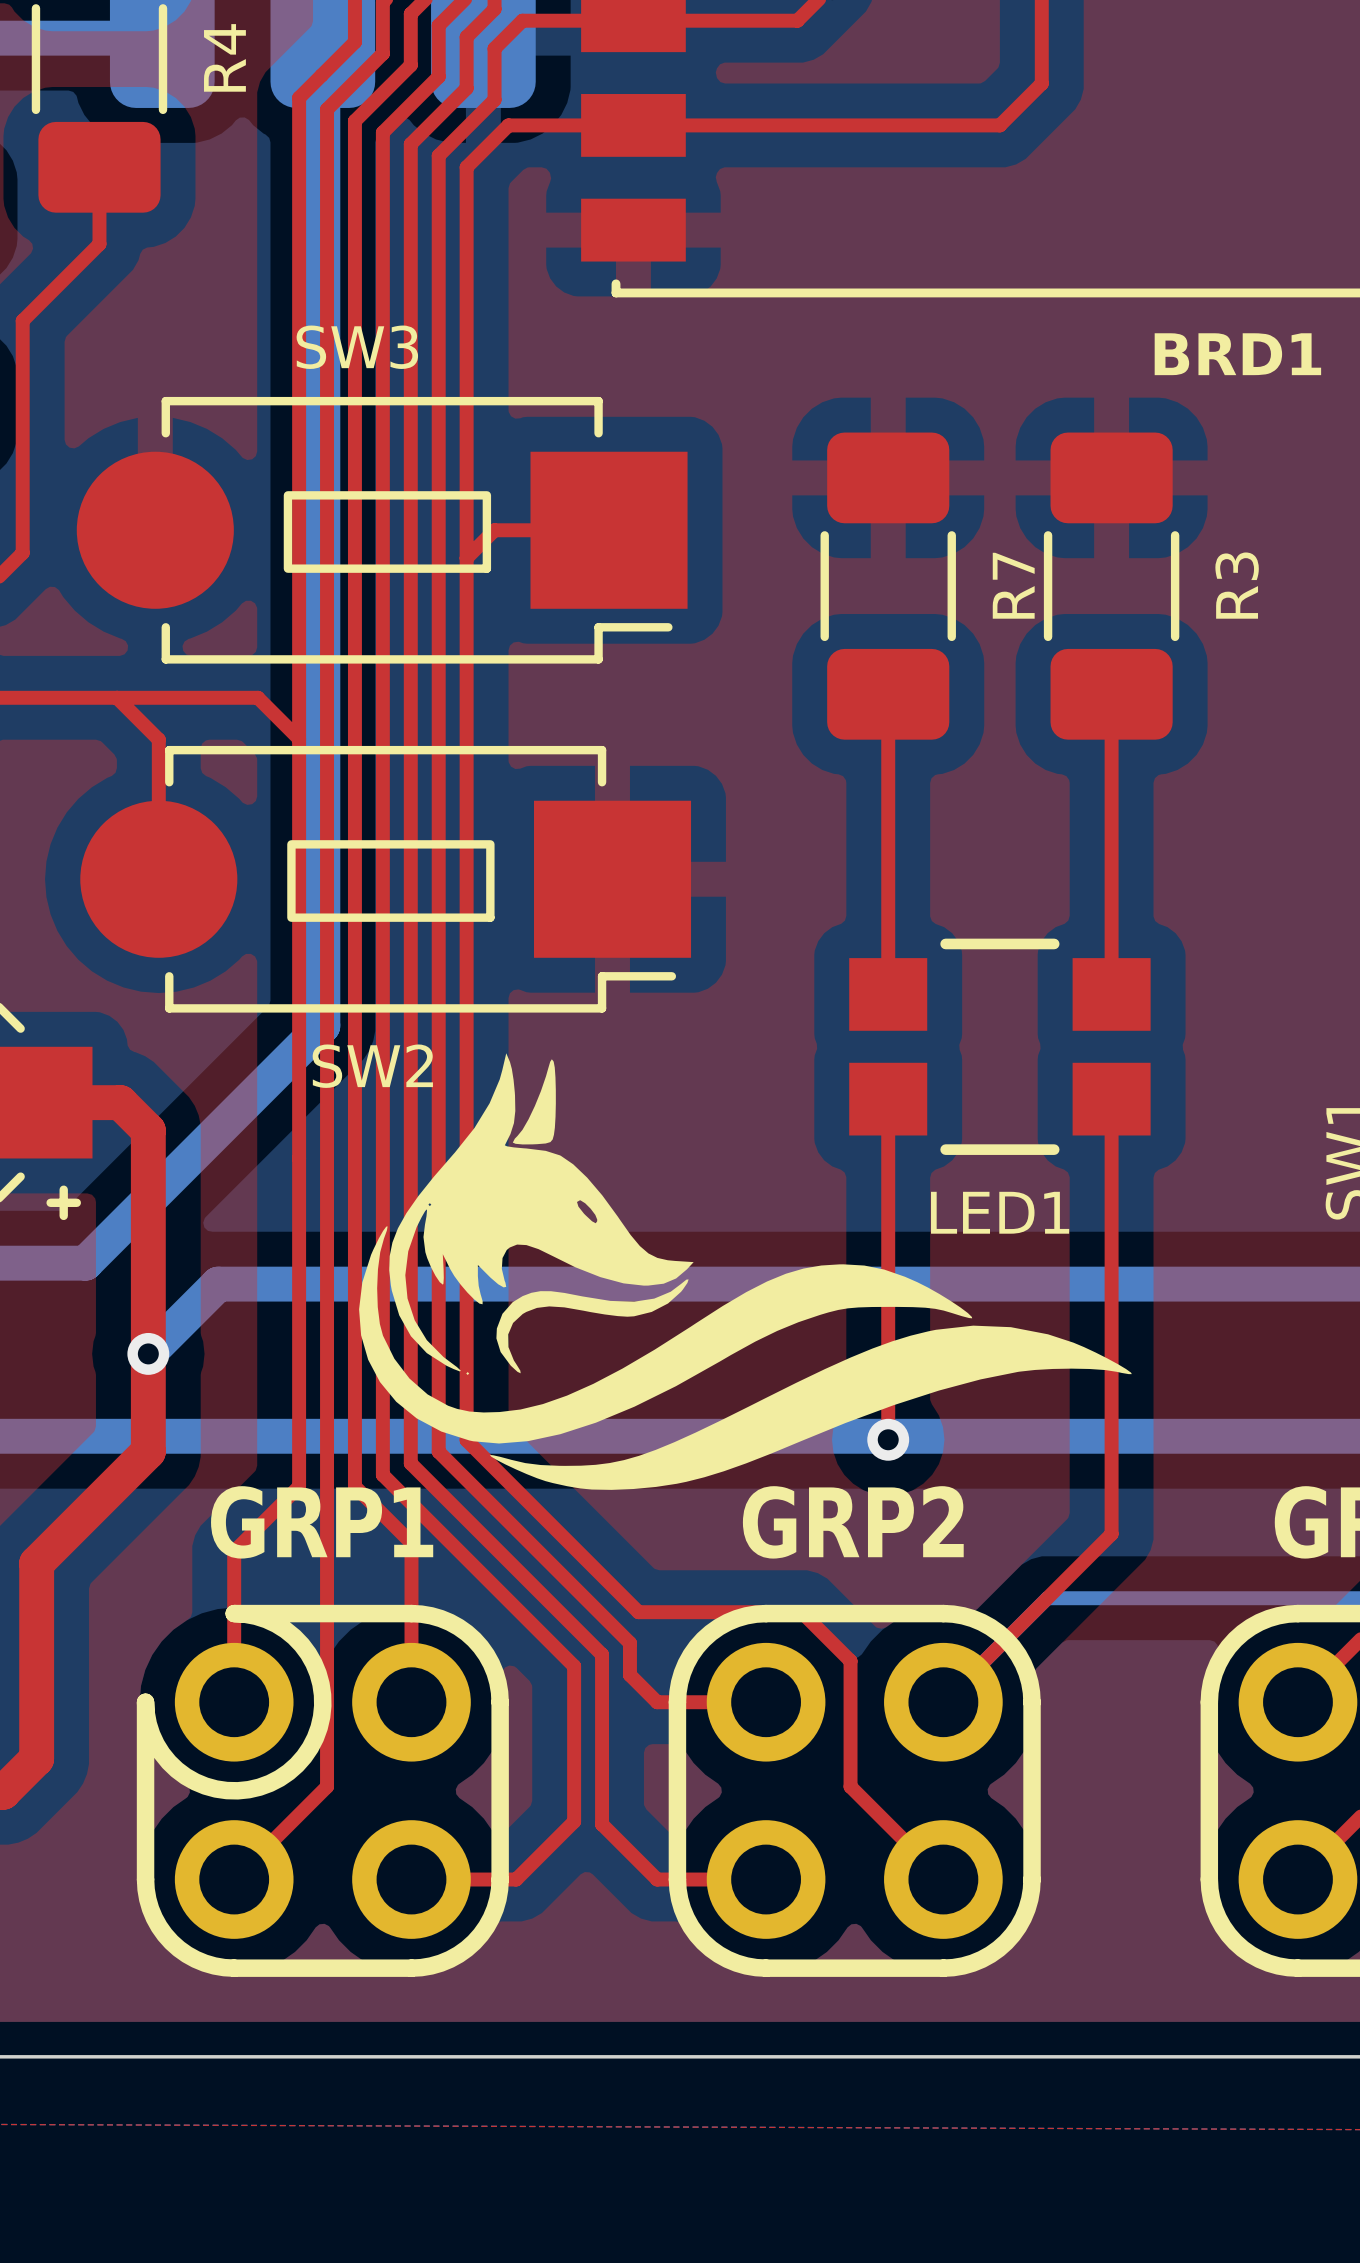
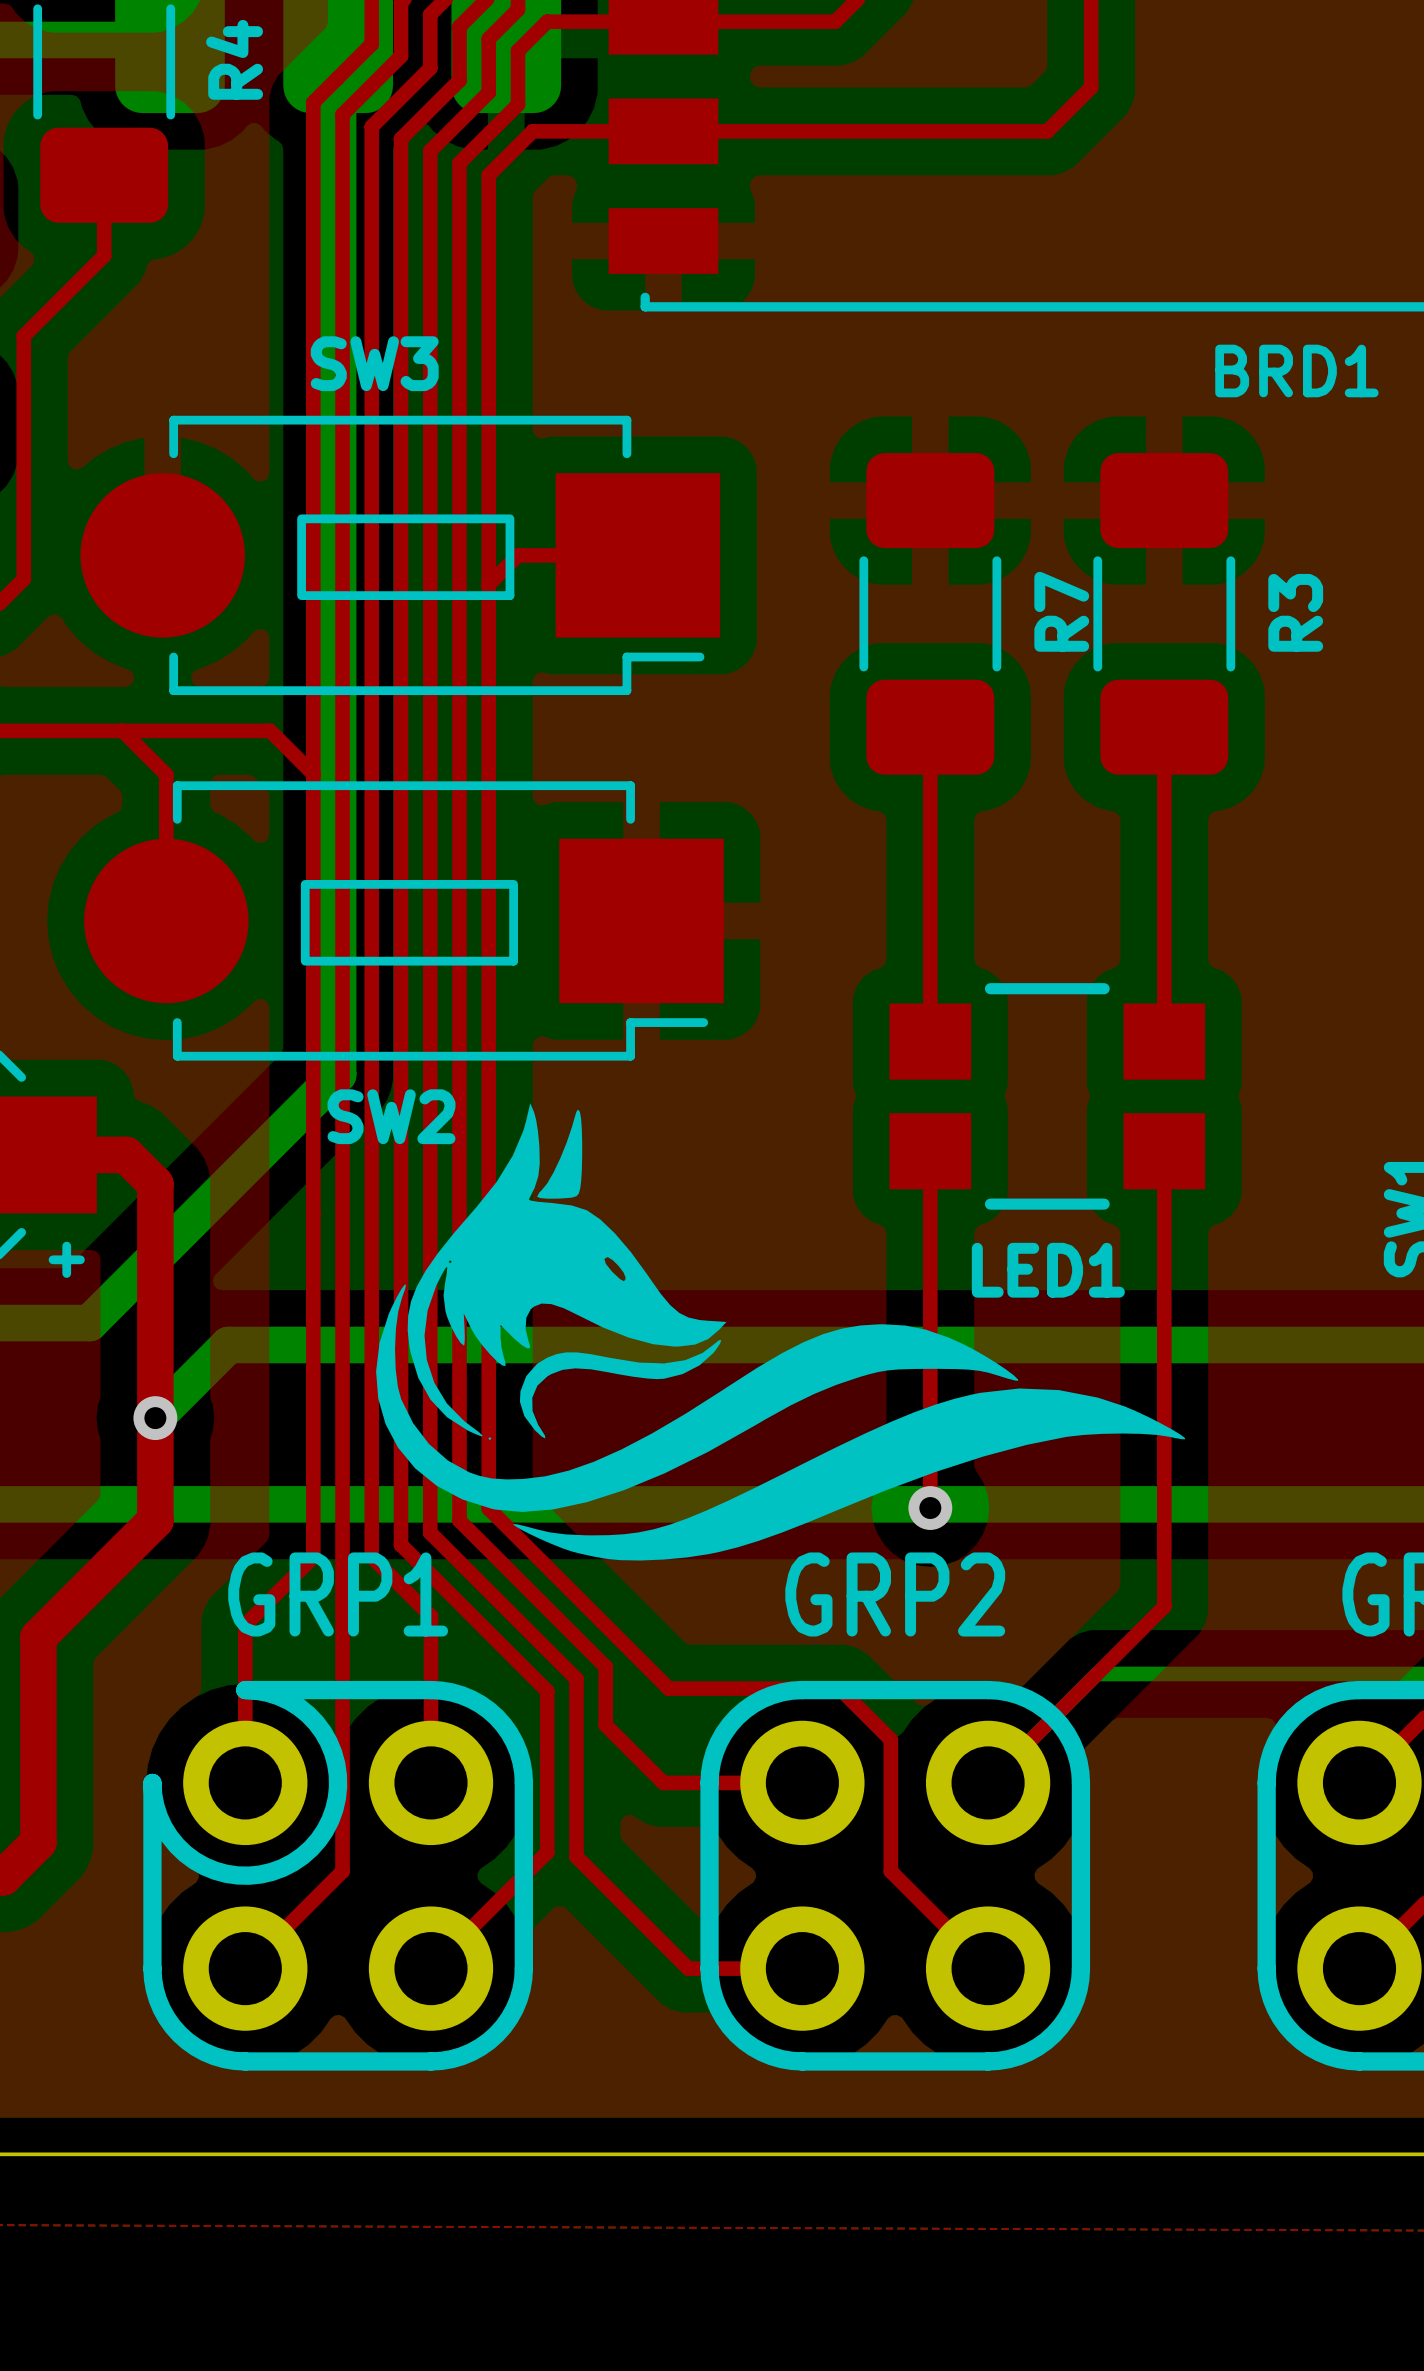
top track: (578, 1591) (629, 1643) (629, 1675) (657, 1702) -> (605, 1666) (605, 1725) (663, 1782) (688, 1782)
top track: (550, 1603) (602, 1654) (602, 1824) -> (576, 1679) (576, 1856) (630, 1910)
top track: (522, 1614) (574, 1666) (574, 1821) (516, 1879) (411, 1879) -> (547, 1691) (547, 1852) (430, 1968)

